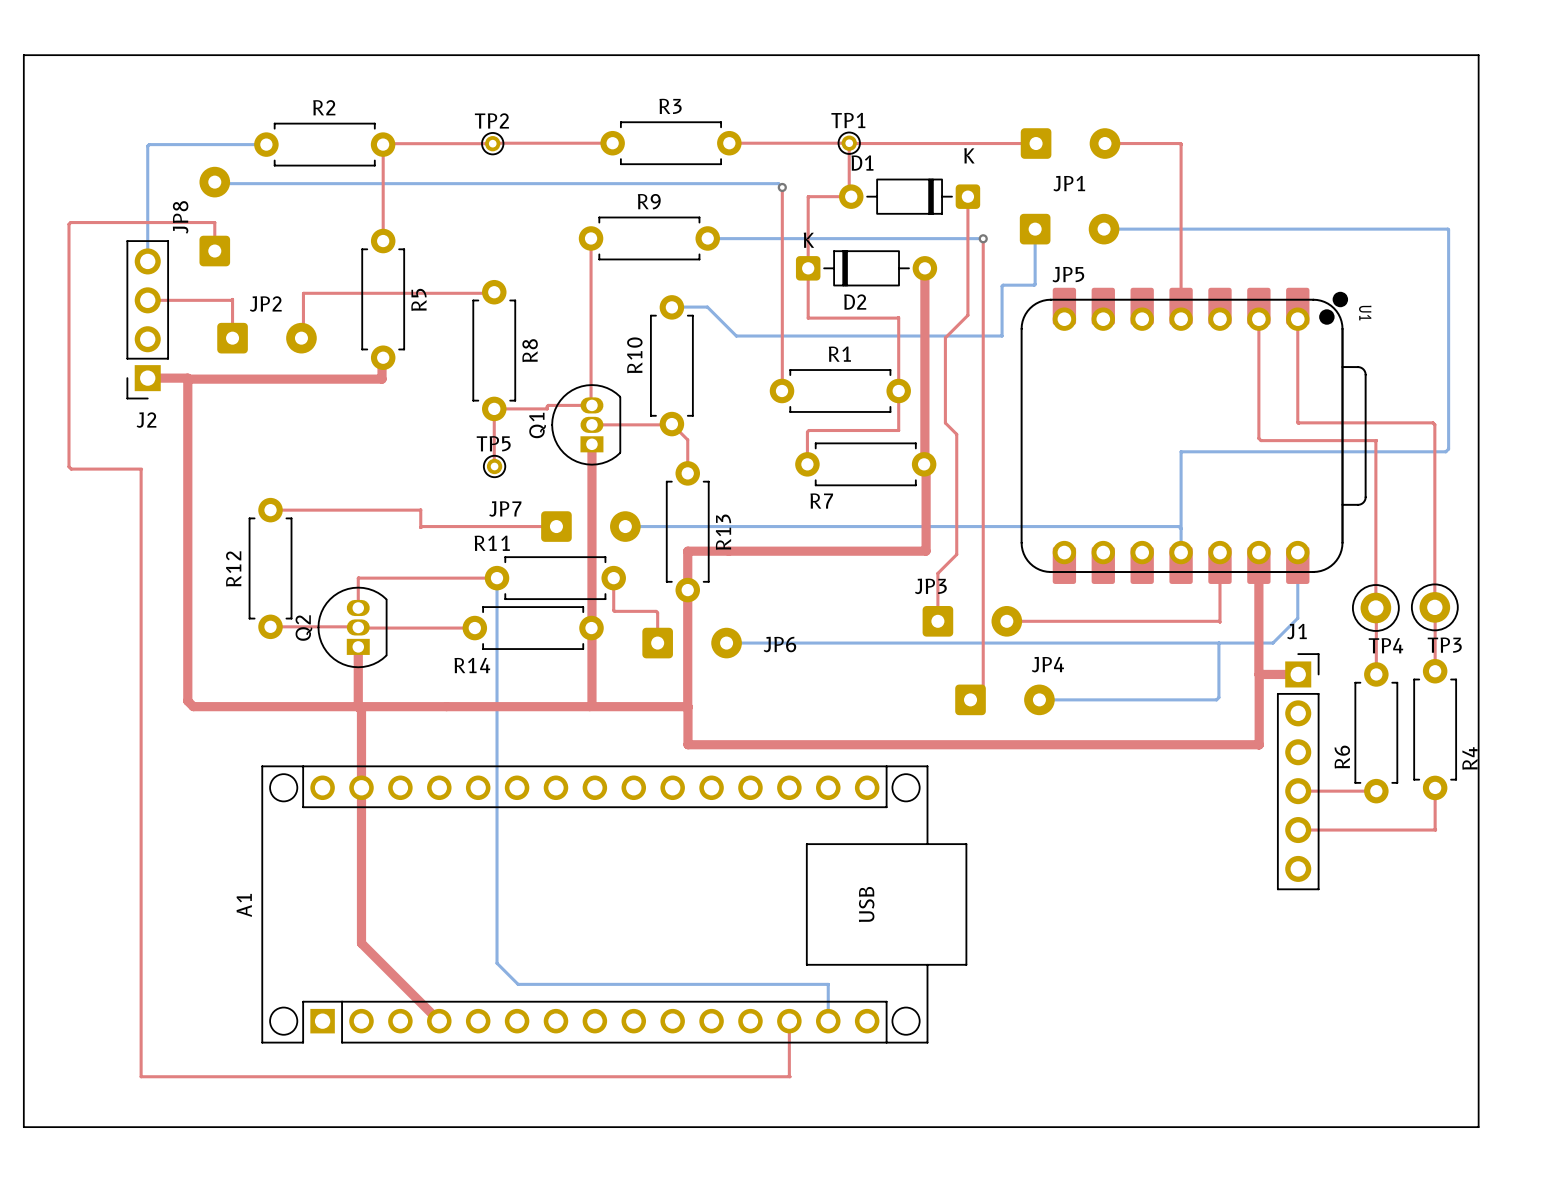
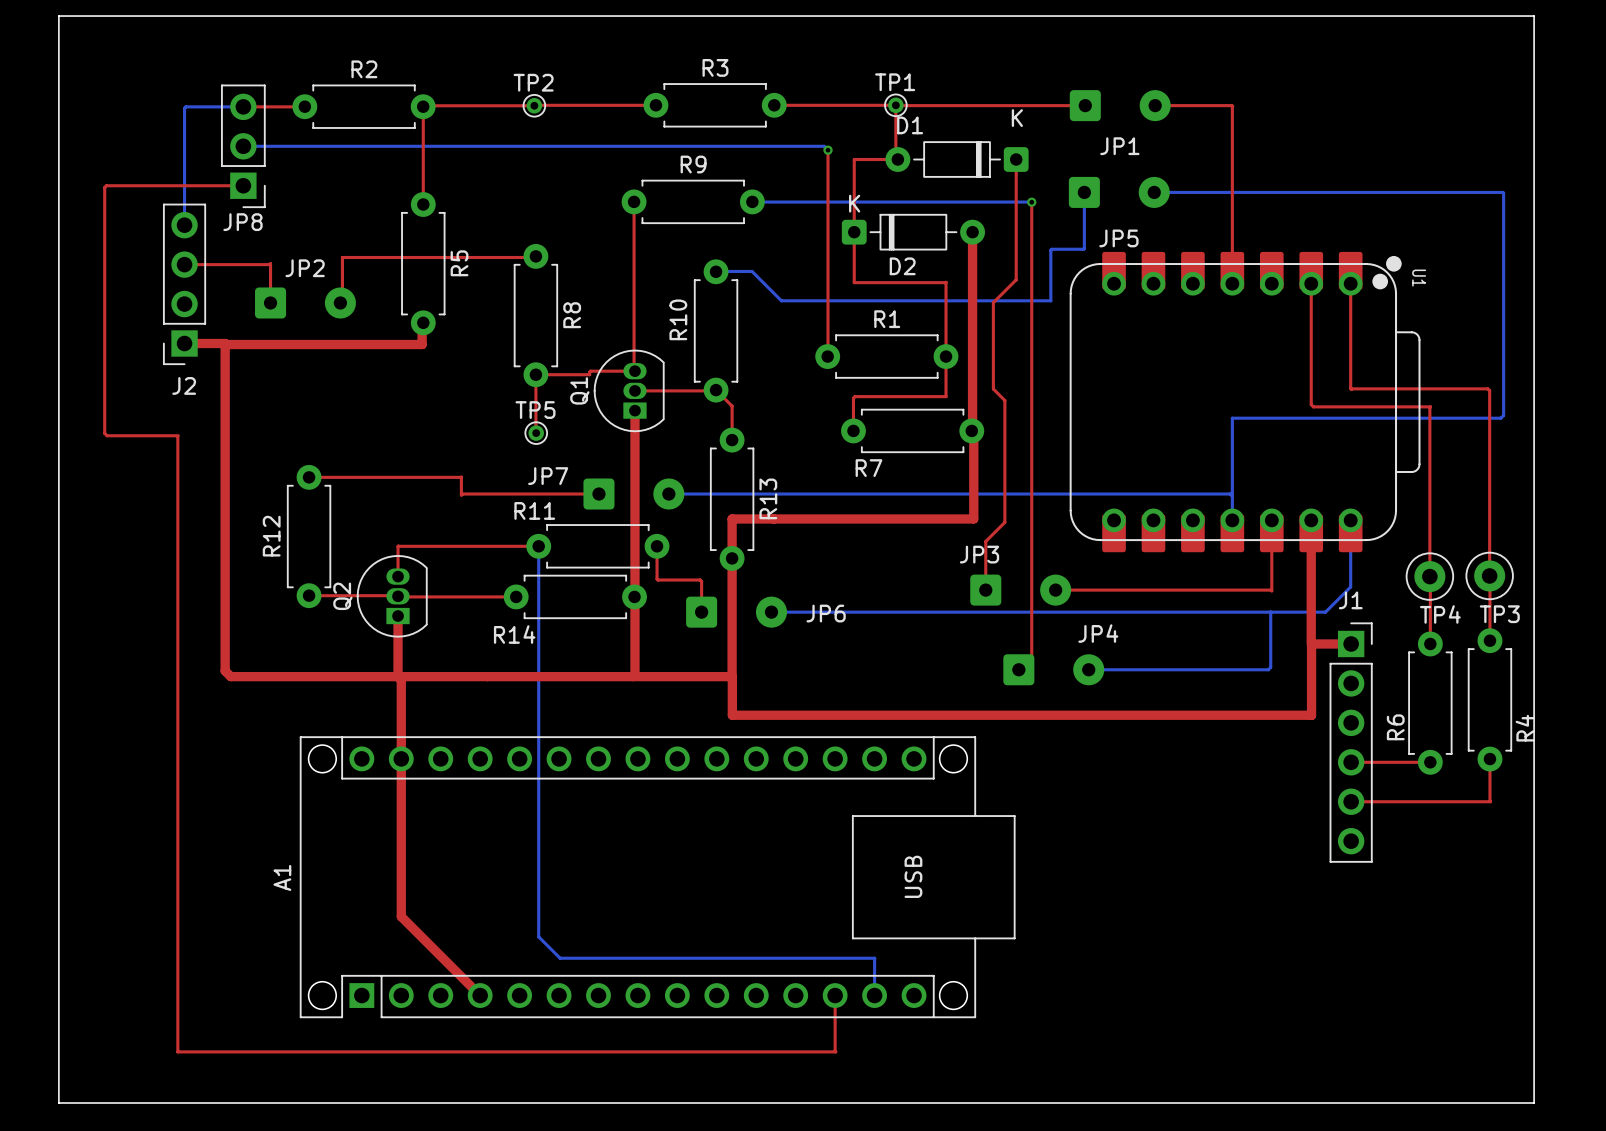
bottom track: (149, 144) (266, 144) -> (185, 106) (243, 106)
top track: none -> (243, 106) (304, 106)
JP8 footprint: [199, 166, 231, 267] -> [221, 84, 266, 209]
JP8 name position: JP8 (180, 217) -> JP8 (243, 222)
top track: (205, 222) (214, 222) -> none
top track: (214, 222) (214, 251) -> none

